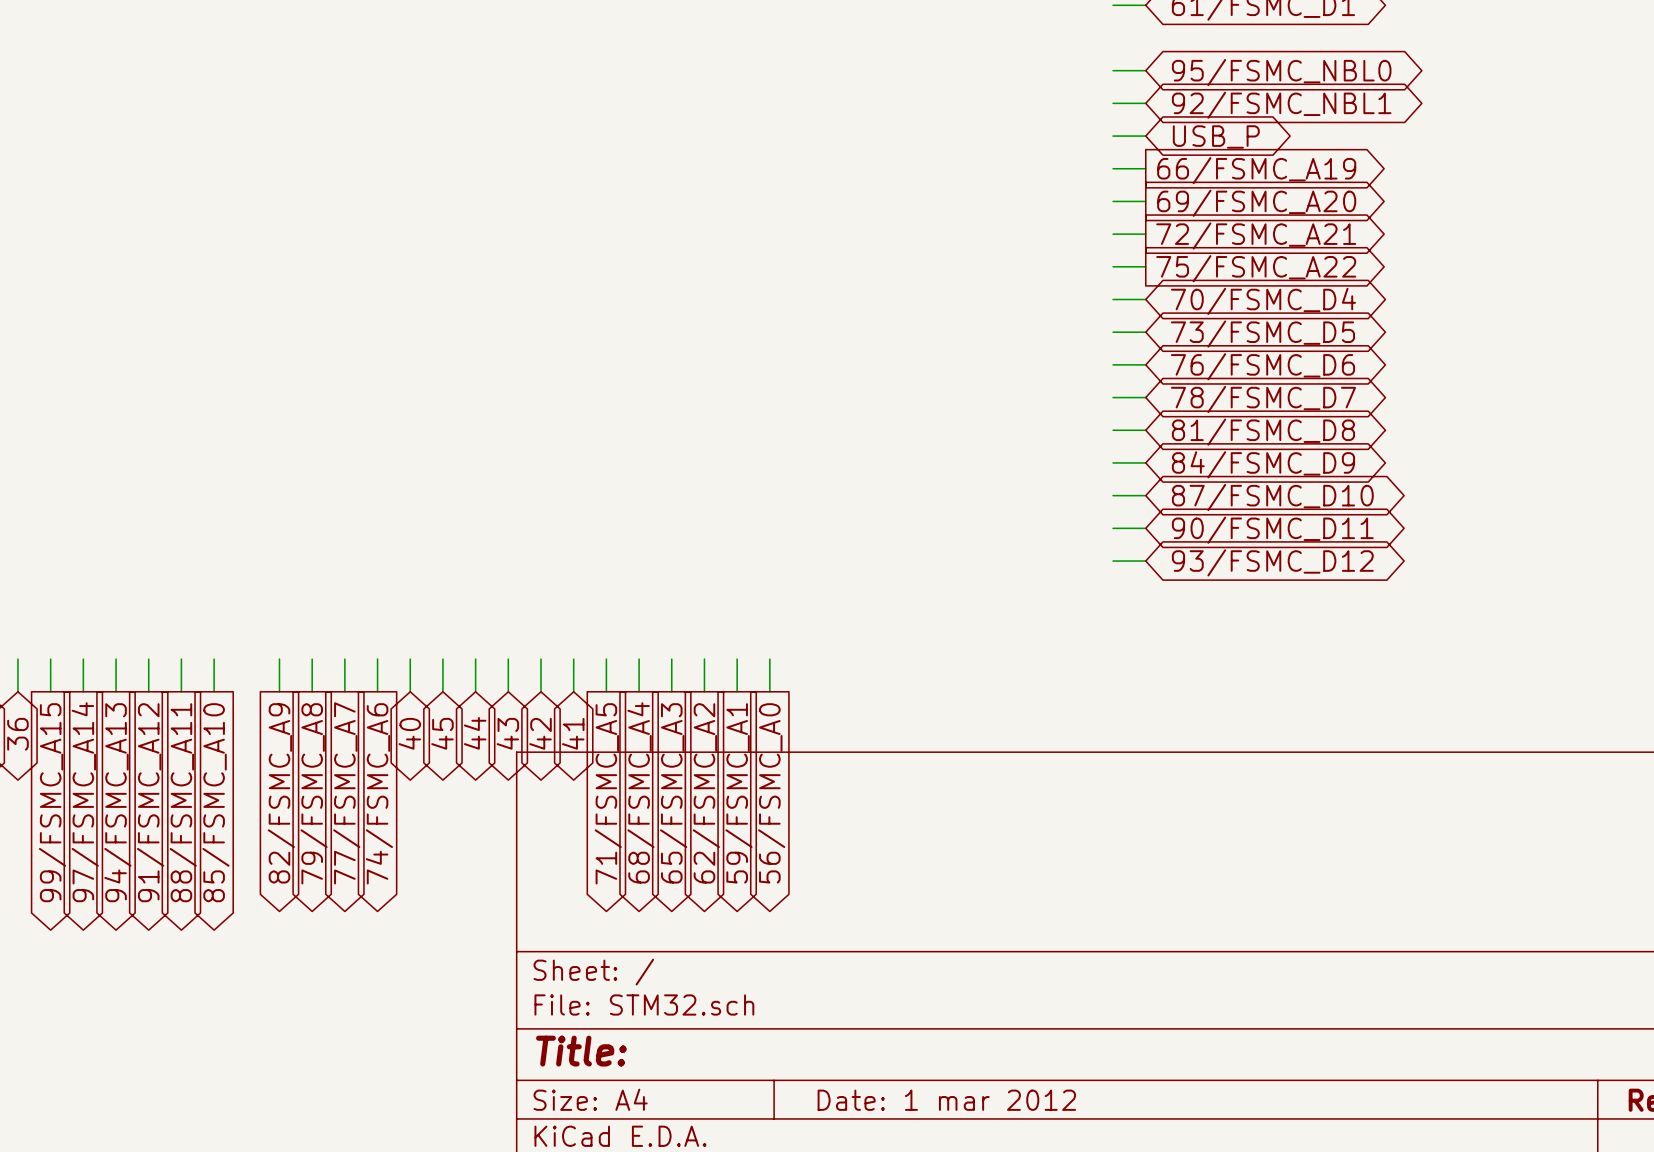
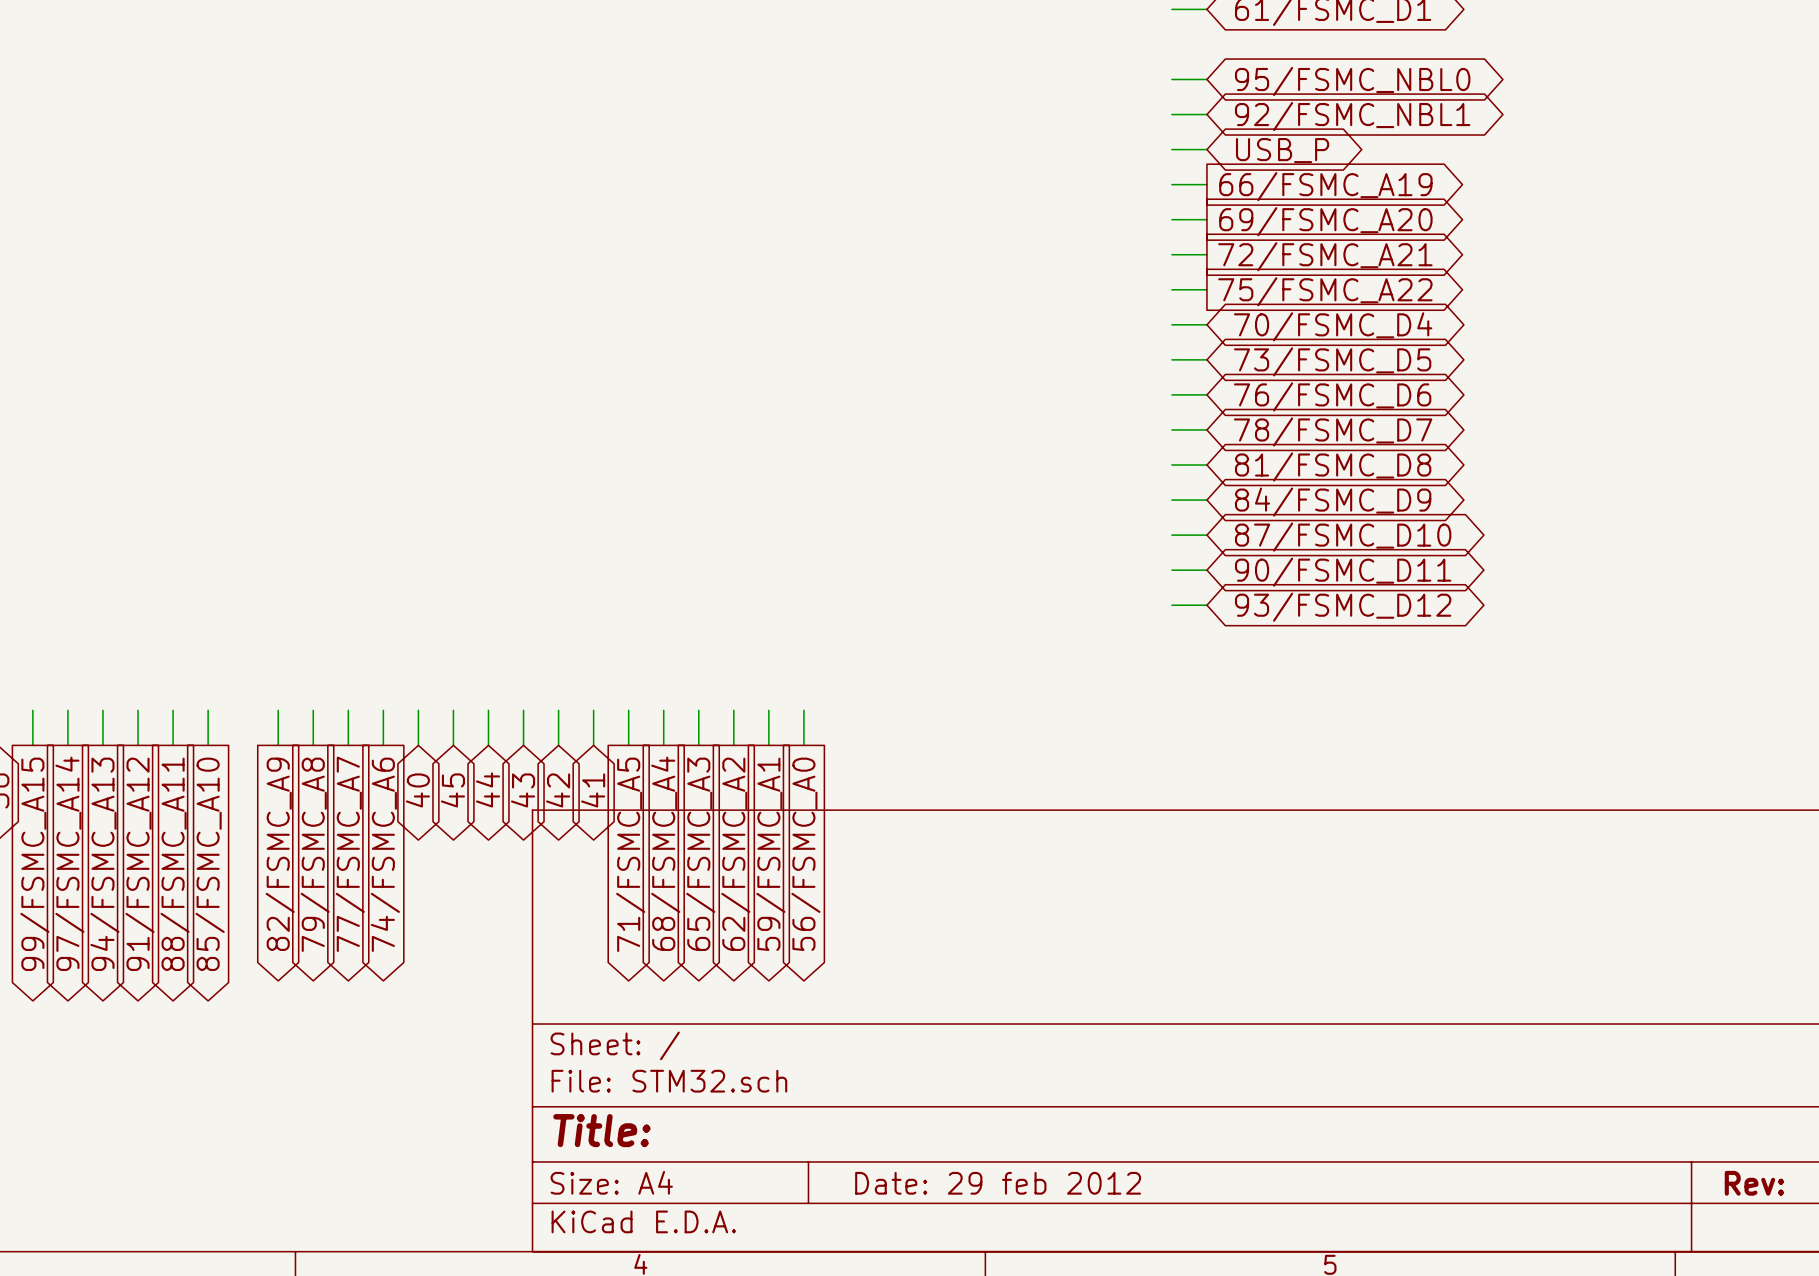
title block: Date: 1 mar 2012 (946, 1100) -> Date: 29 feb 2012 (998, 1183)

